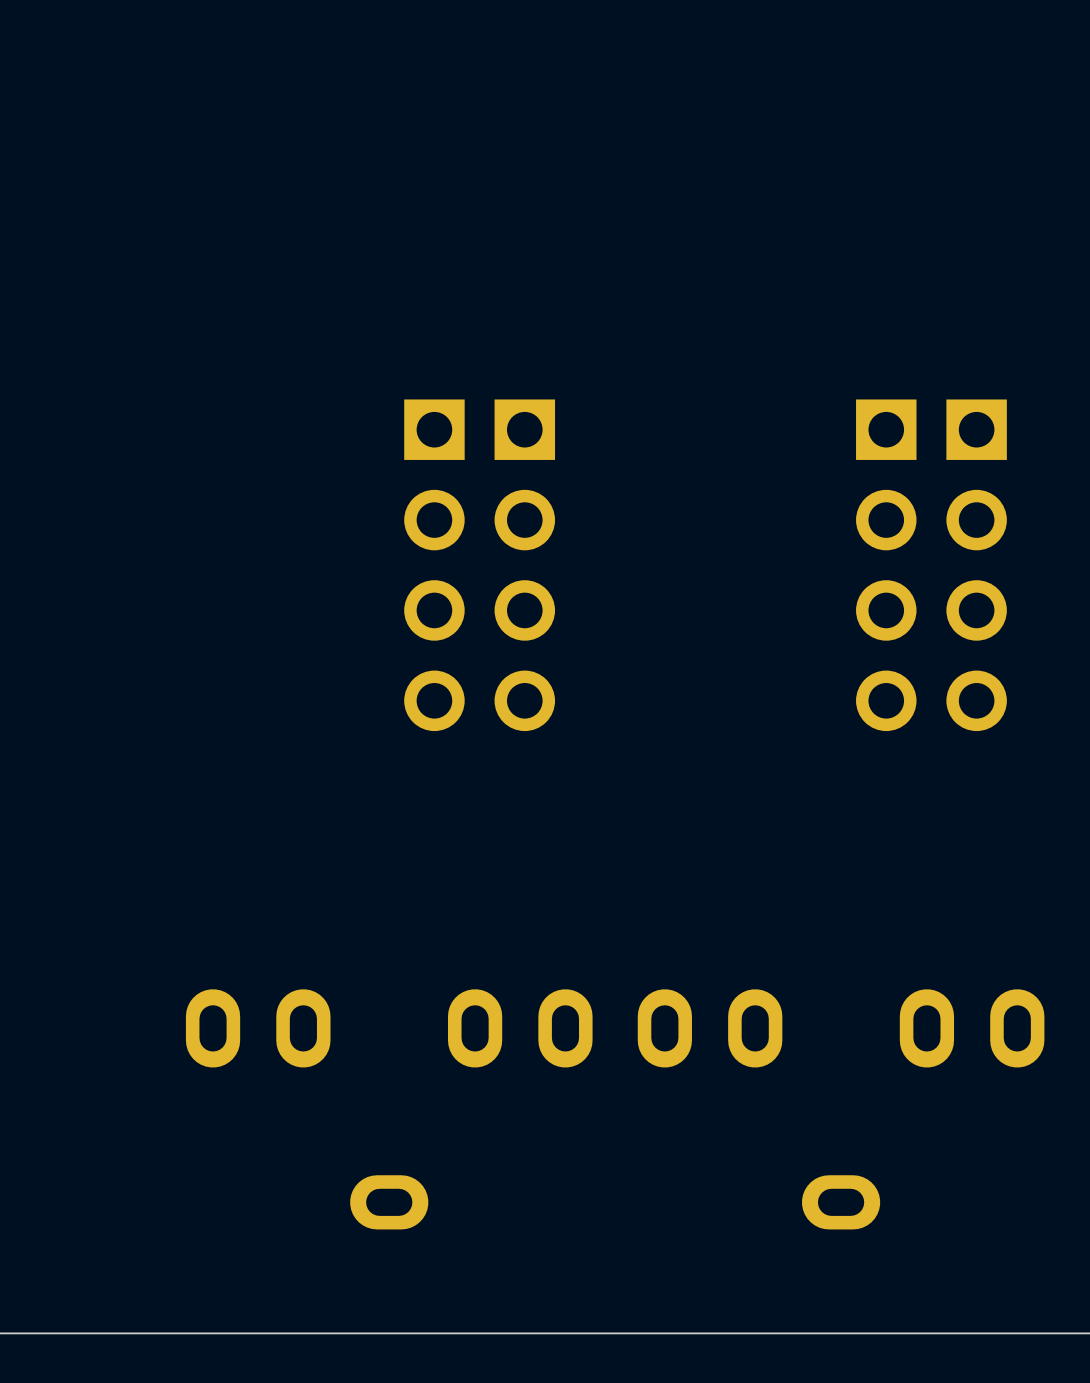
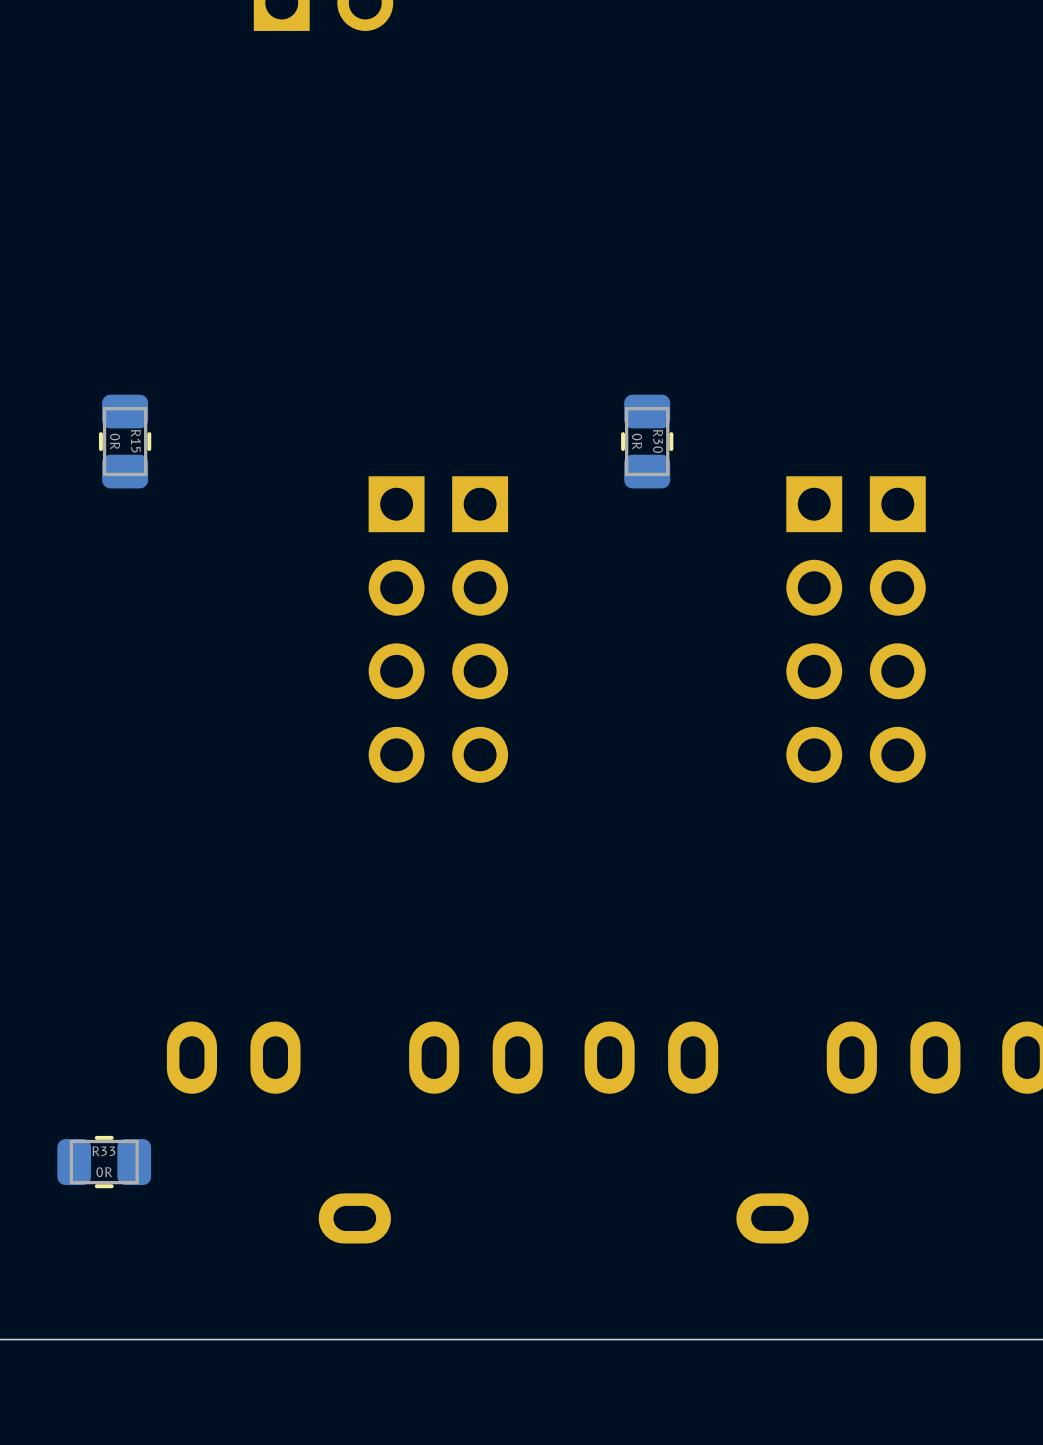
R15: none -> 0R (125, 441)
R30: none -> 0R (647, 441)
R33: none -> 0R (104, 1162)

